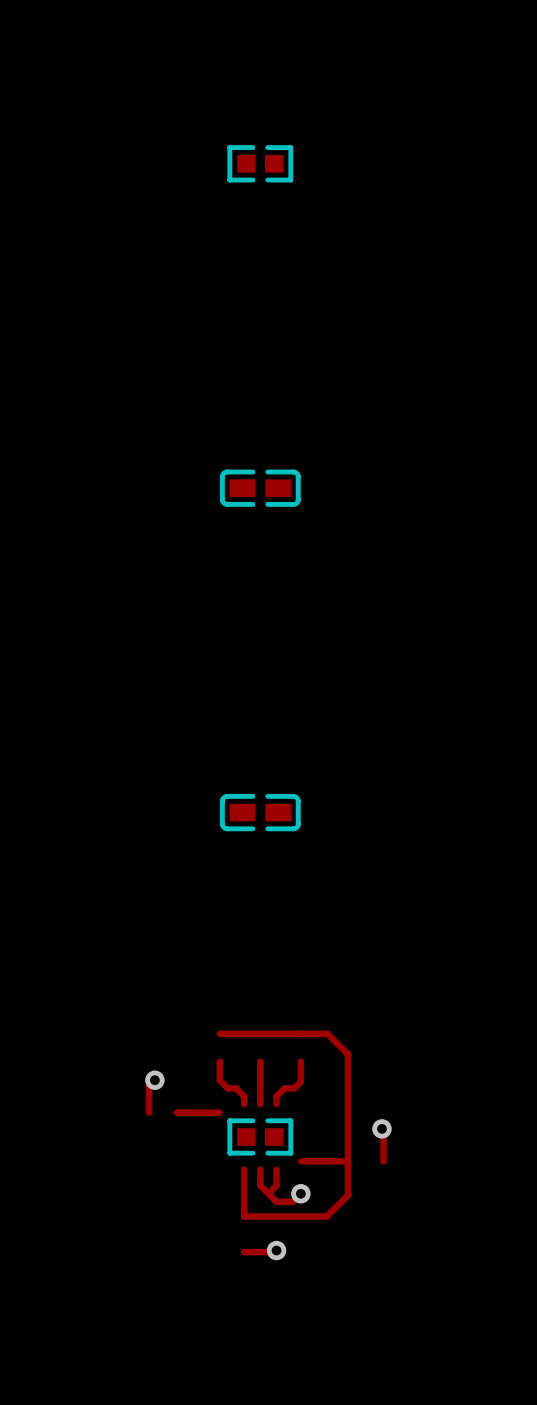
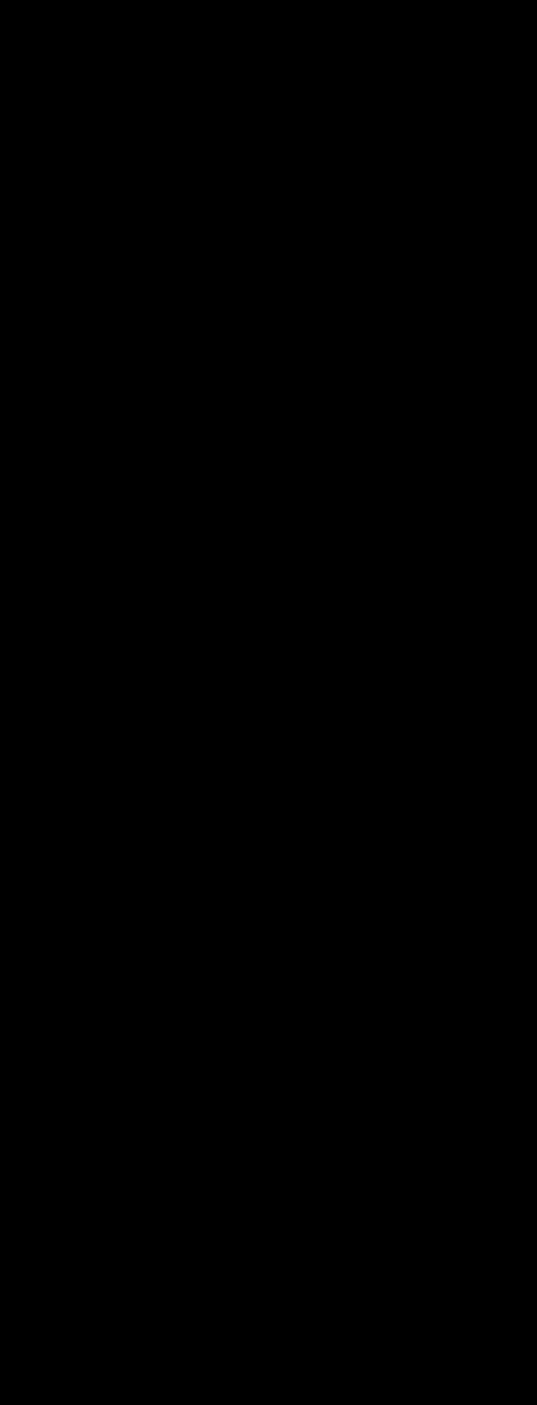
part: (260, 163) -> none
part: (260, 488) -> none
part: (260, 812) -> none
track: (219, 1033) (327, 1033) (347, 1054) (347, 1195) (326, 1216) (244, 1216) (244, 1169) -> none
track: (219, 1061) (219, 1080) (227, 1088) (235, 1088) (244, 1096) (244, 1104) -> none
track: (260, 1061) (260, 1104) -> none
track: (300, 1061) (300, 1081) (294, 1088) (284, 1088) (276, 1096) (276, 1104) -> none
track: (154, 1080) (149, 1086) (149, 1112) -> none
via: (154, 1080) -> none
track: (176, 1112) (219, 1112) -> none
track: (381, 1128) (383, 1130) (383, 1161) -> none
via: (381, 1128) -> none
part: (260, 1136) -> none
track: (301, 1161) (347, 1161) -> none
track: (260, 1169) (260, 1185) (276, 1201) (292, 1201) (300, 1193) -> none
track: (276, 1169) (276, 1185) (268, 1193) -> none
via: (300, 1193) -> none
track: (276, 1250) (274, 1252) (244, 1252) -> none
via: (276, 1250) -> none

